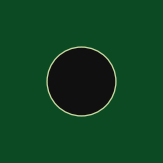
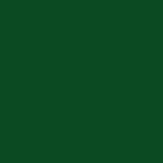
part: (81, 81) -> none

